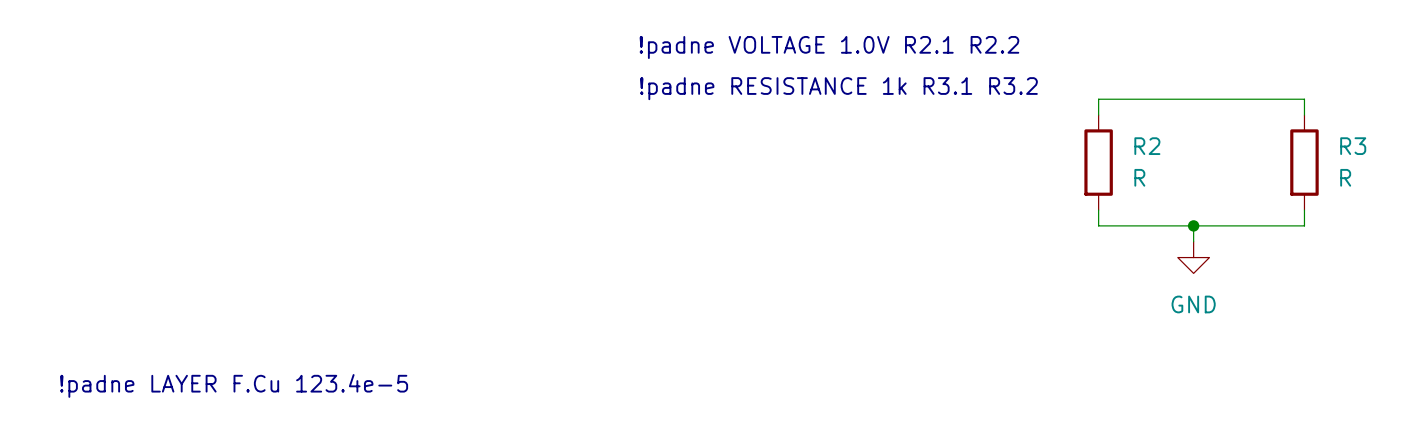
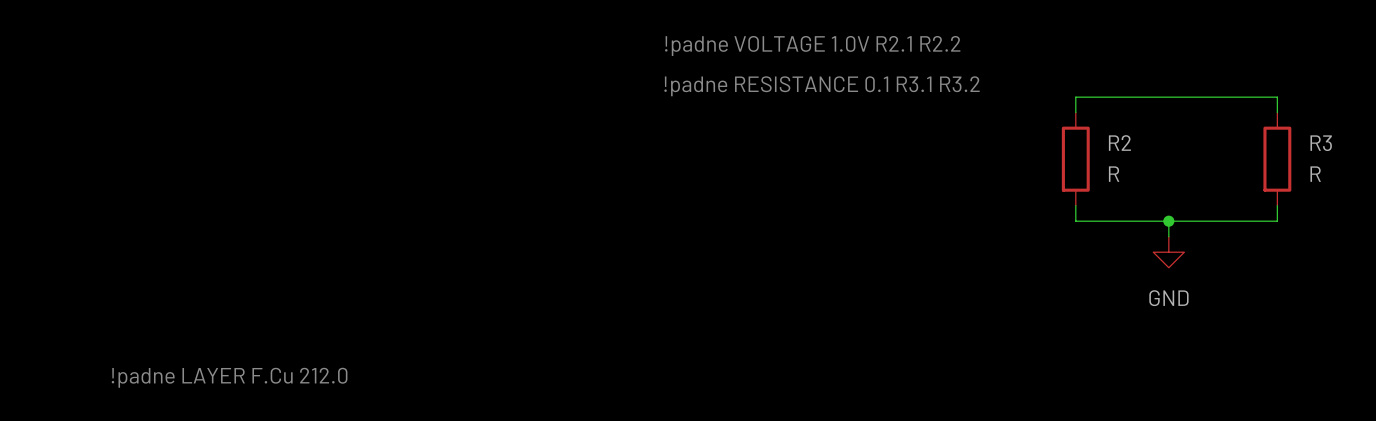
text: !padne RESISTANCE 1k R3.1 R3.2 (838, 88) -> !padne RESISTANCE 0.1 R3.1 R3.2 (822, 86)
text: !padne LAYER F.Cu 123.4e-5 (234, 385) -> !padne LAYER F.Cu 212.0 (229, 377)

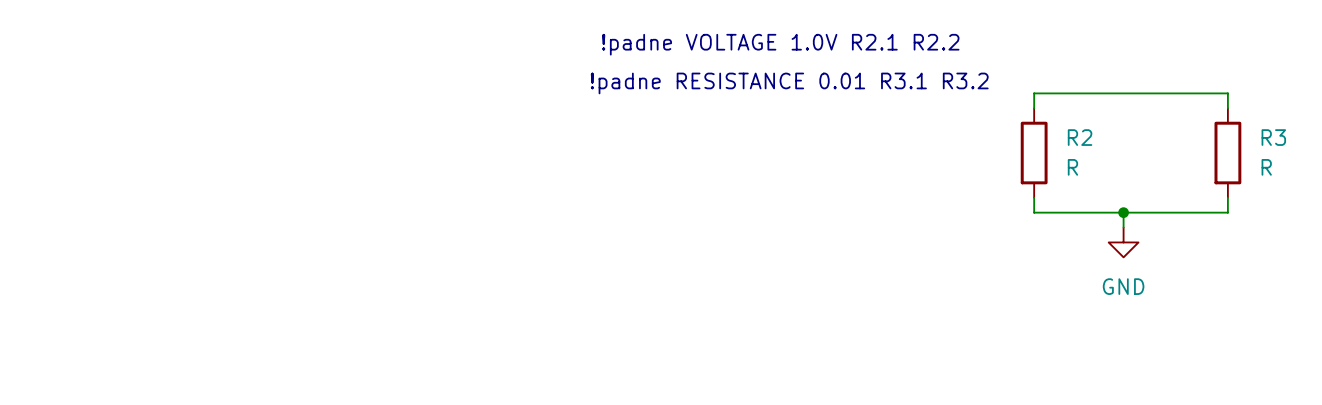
text: !padne RESISTANCE 0.1 R3.1 R3.2 (822, 86) -> !padne RESISTANCE 0.01 R3.1 R3.2 (789, 83)
text: !padne LAYER F.Cu 212.0 (229, 377) -> none

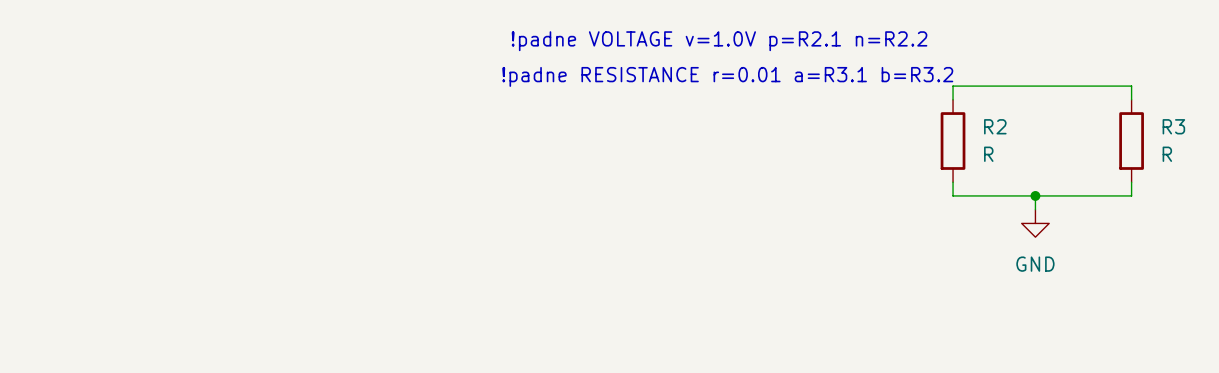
text: !padne VOLTAGE 1.0V R2.1 R2.2 (780, 44) -> !padne VOLTAGE v=1.0V p=R2.1 n=R2.2 (719, 41)
text: !padne RESISTANCE 0.01 R3.1 R3.2 (789, 83) -> !padne RESISTANCE r=0.01 a=R3.1 b=R3.2 (727, 76)

